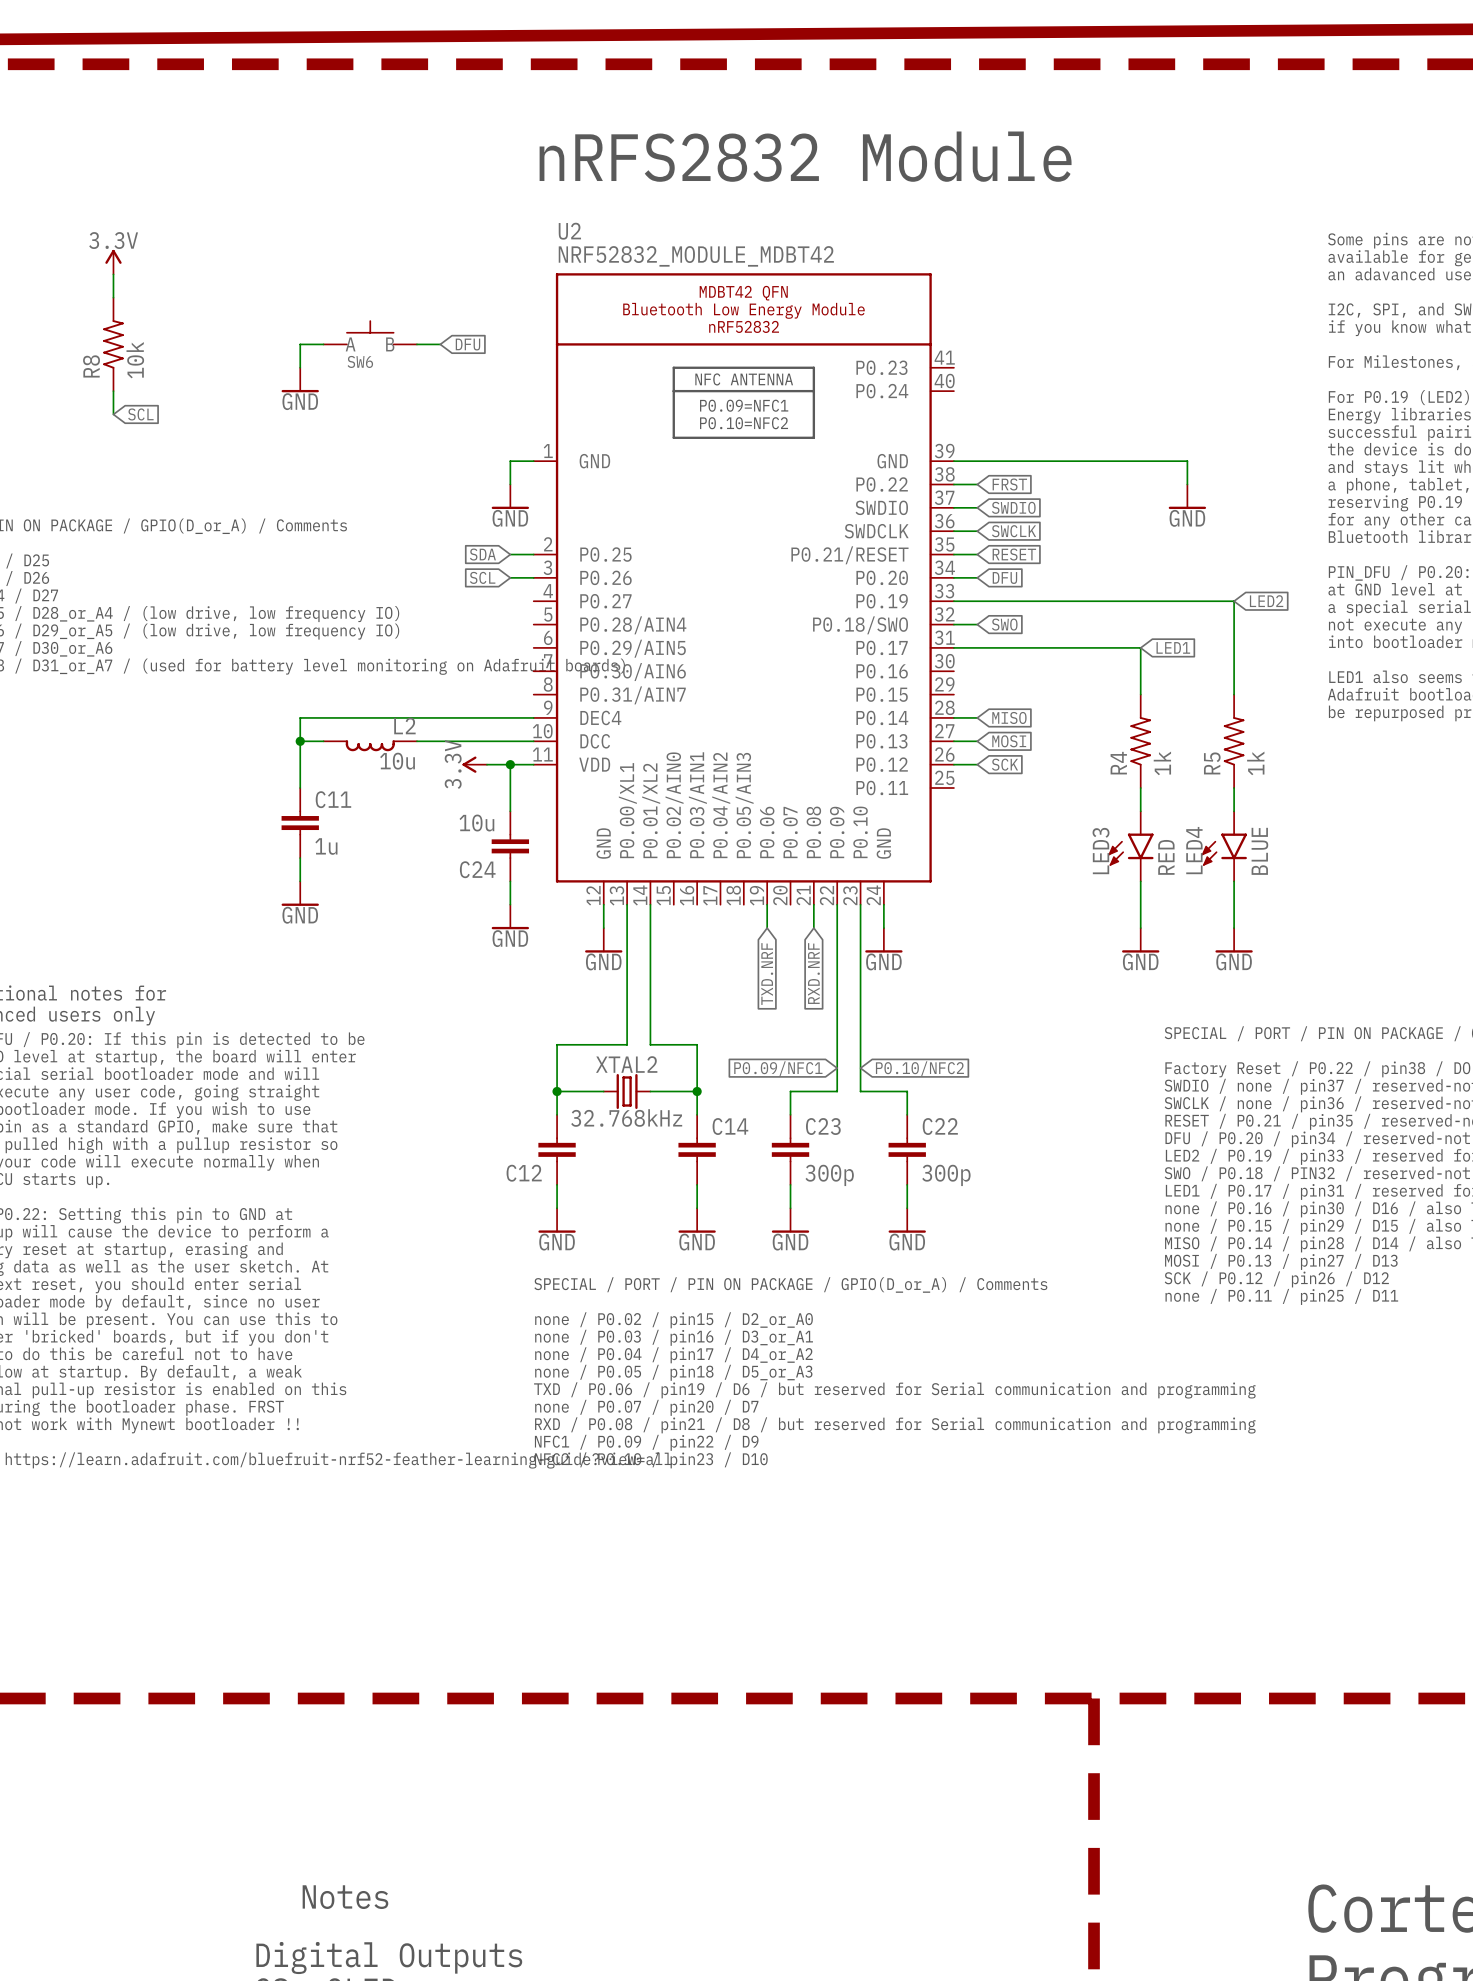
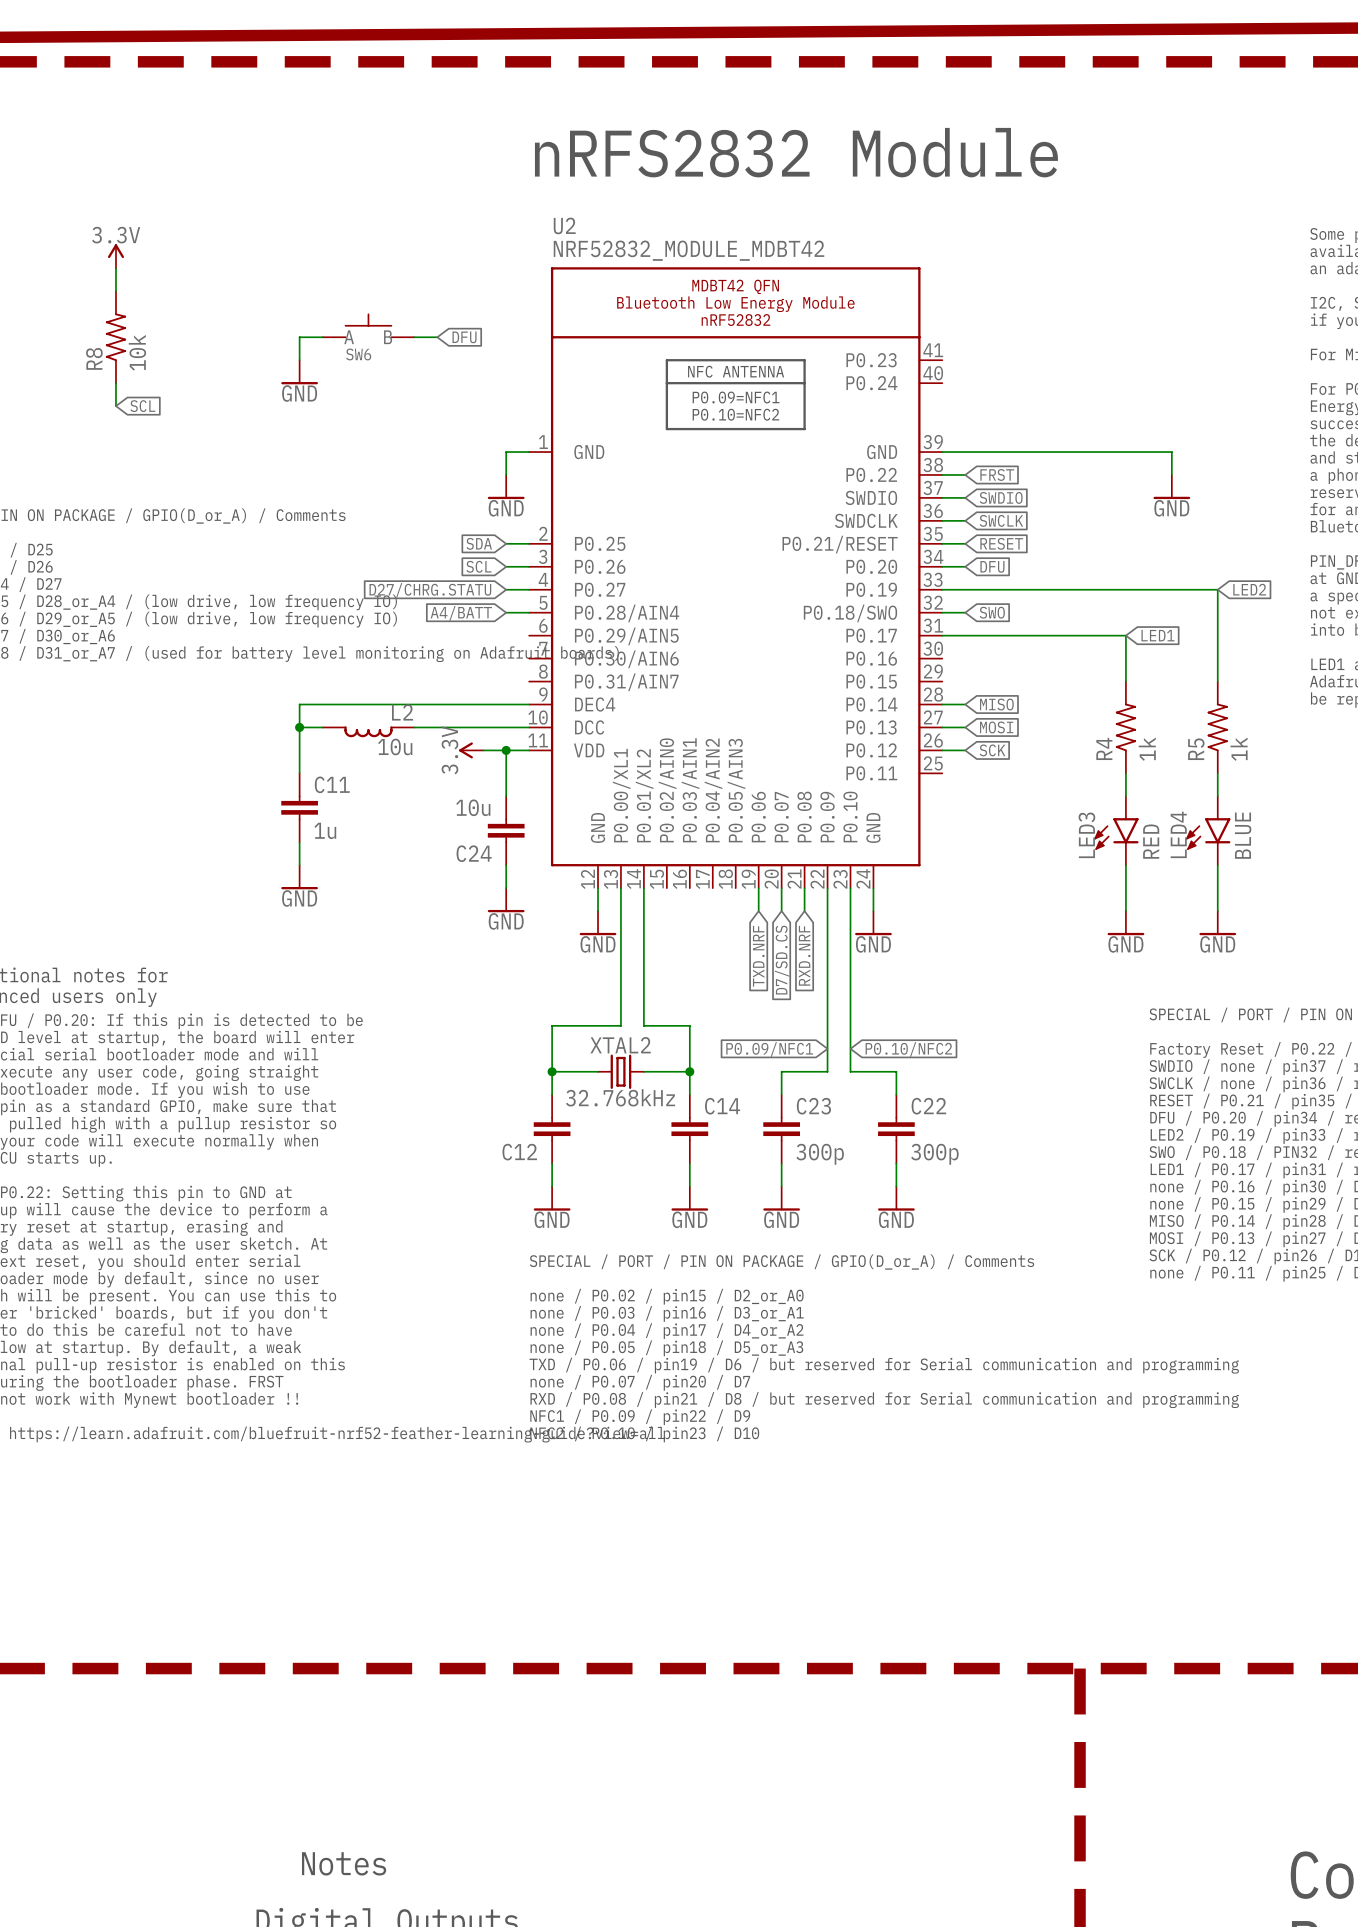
global label: none -> D27/CHRG.STATU (430, 590)
wire: none -> (506, 589) (529, 589)
wire: none -> (506, 612) (529, 612)
global label: none -> A4/BATT (461, 613)
wire: none -> (781, 888) (781, 911)
global label: none -> D7/SD.CS (782, 960)

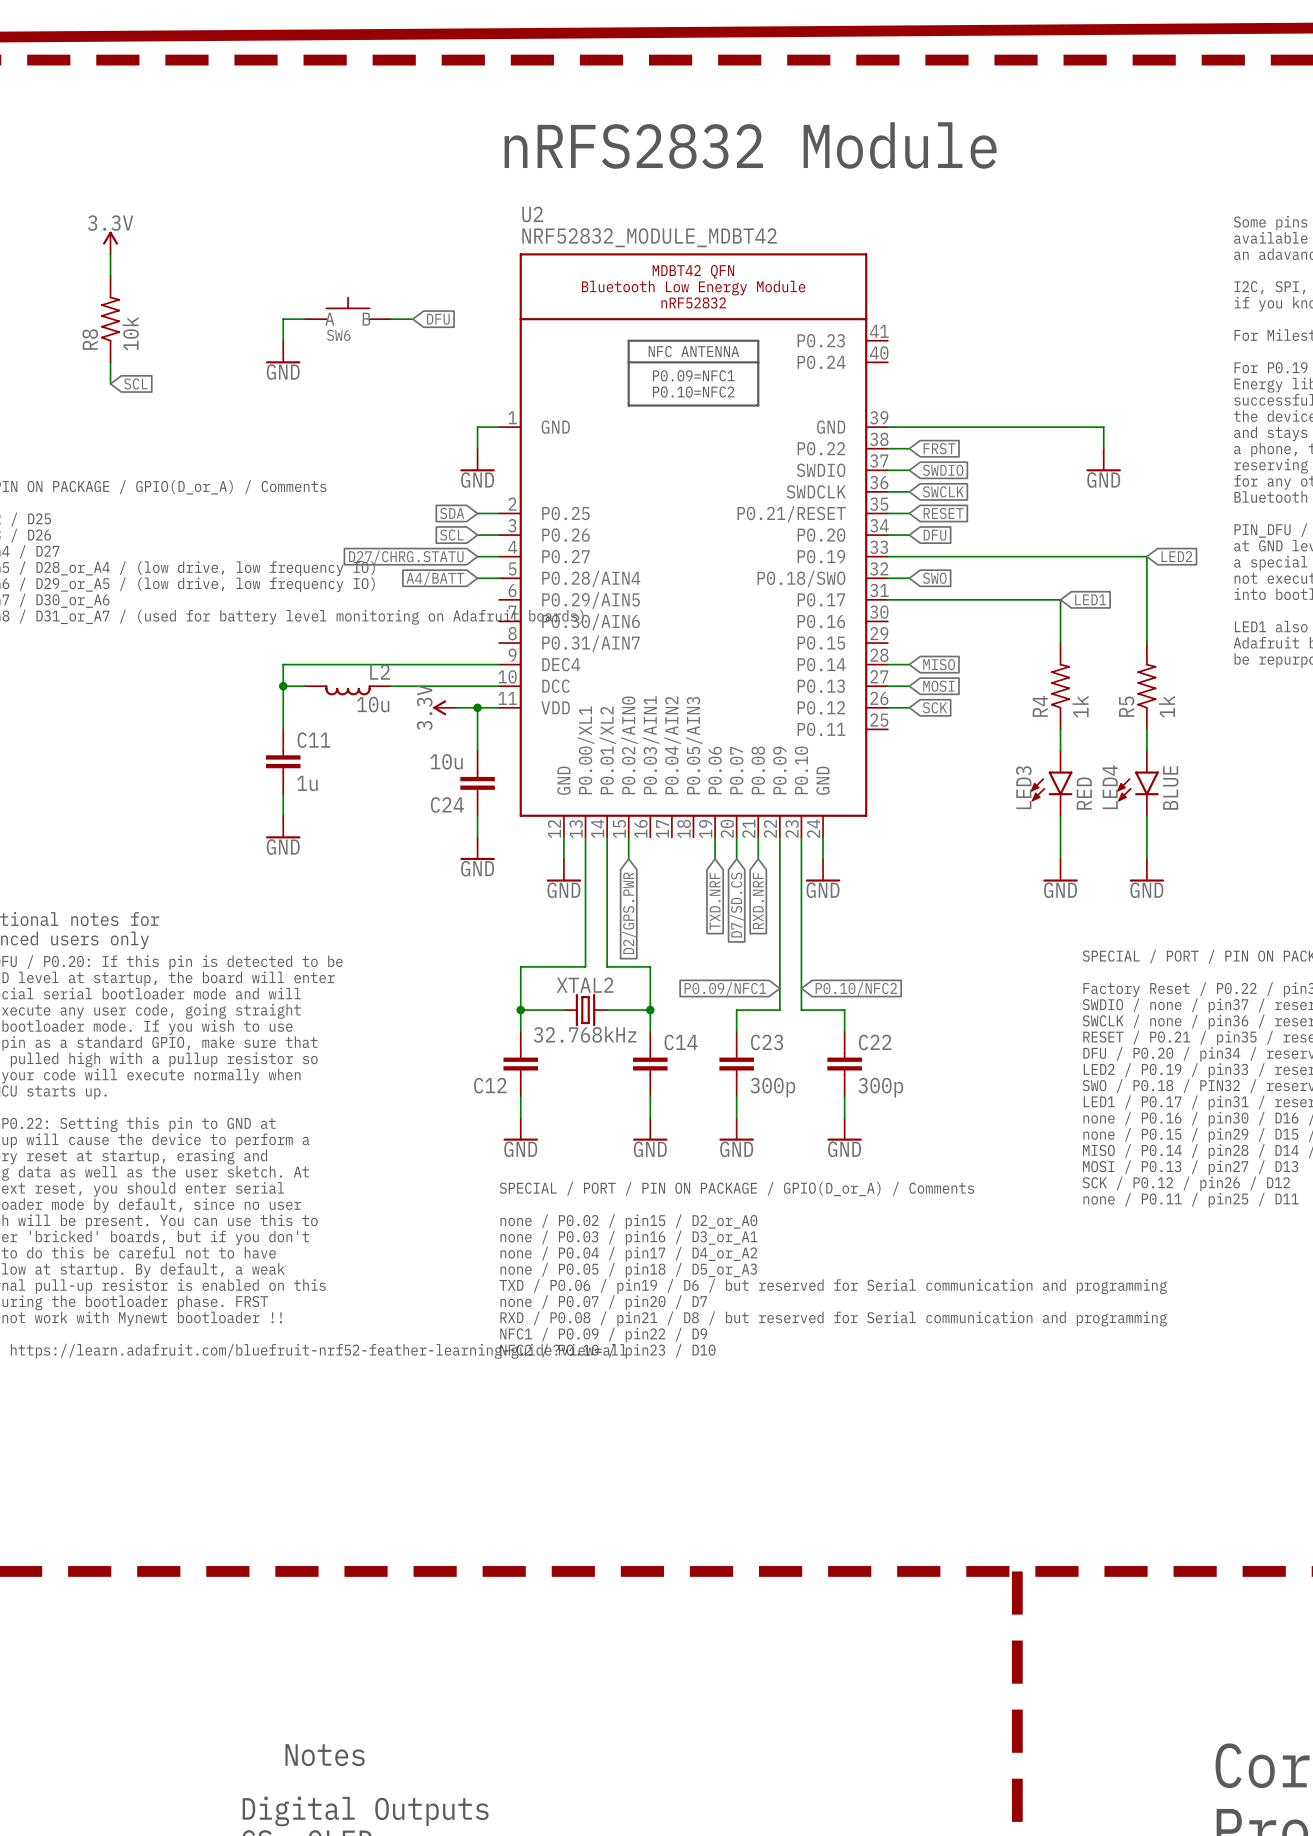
wire: none -> (628, 837) (628, 858)
global label: none -> D2/GPS.PWR (629, 913)

